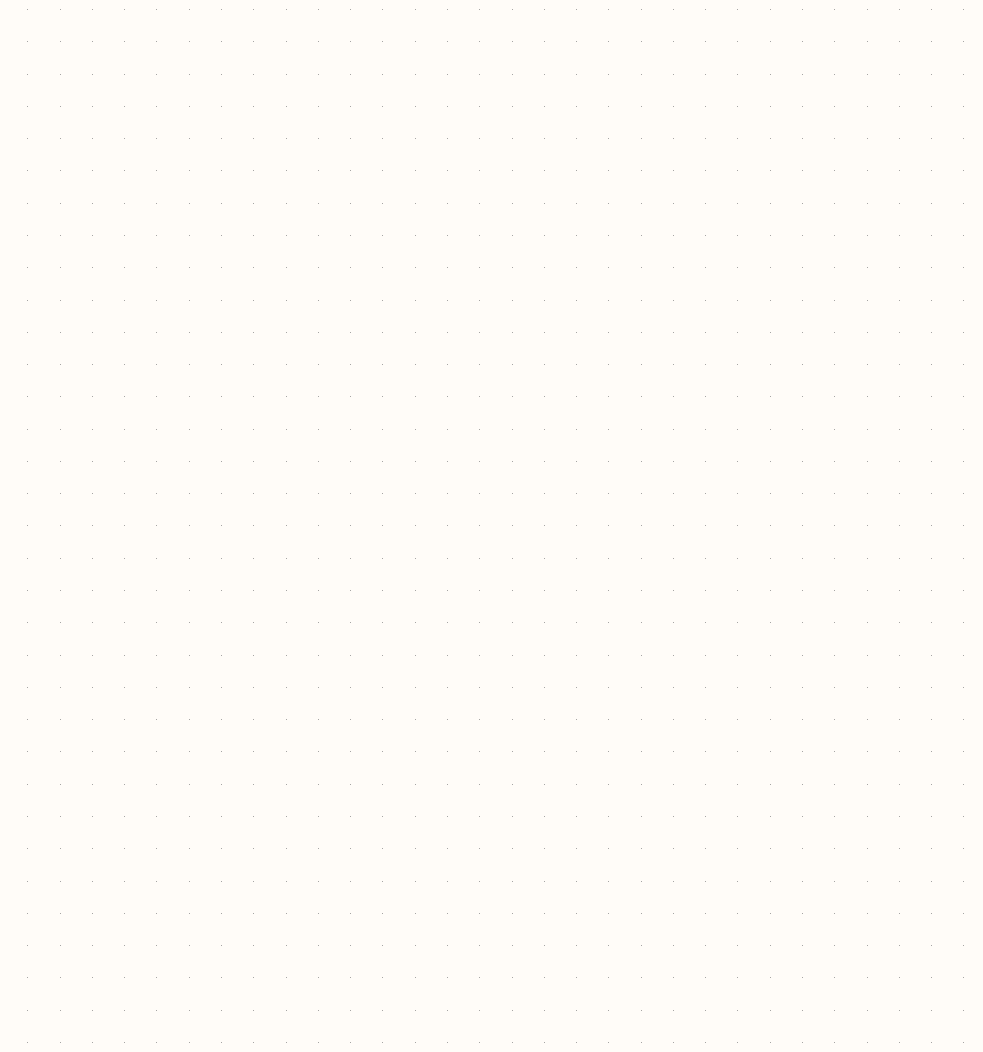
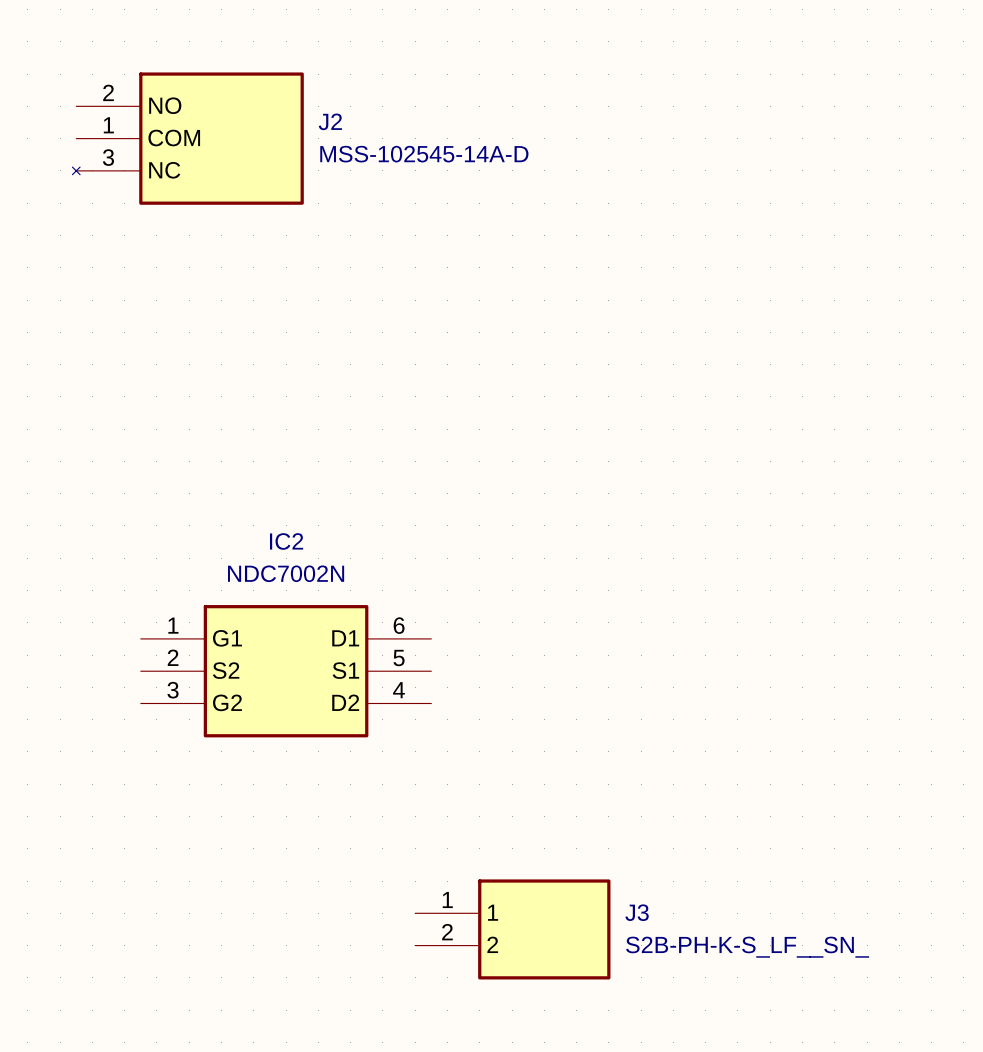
J2: none -> MSS-102545-14A-D (188, 138)
IC2: none -> NDC7002N (286, 671)
J3: none -> S2B-PH-K-S_LF__SN_ (512, 929)

